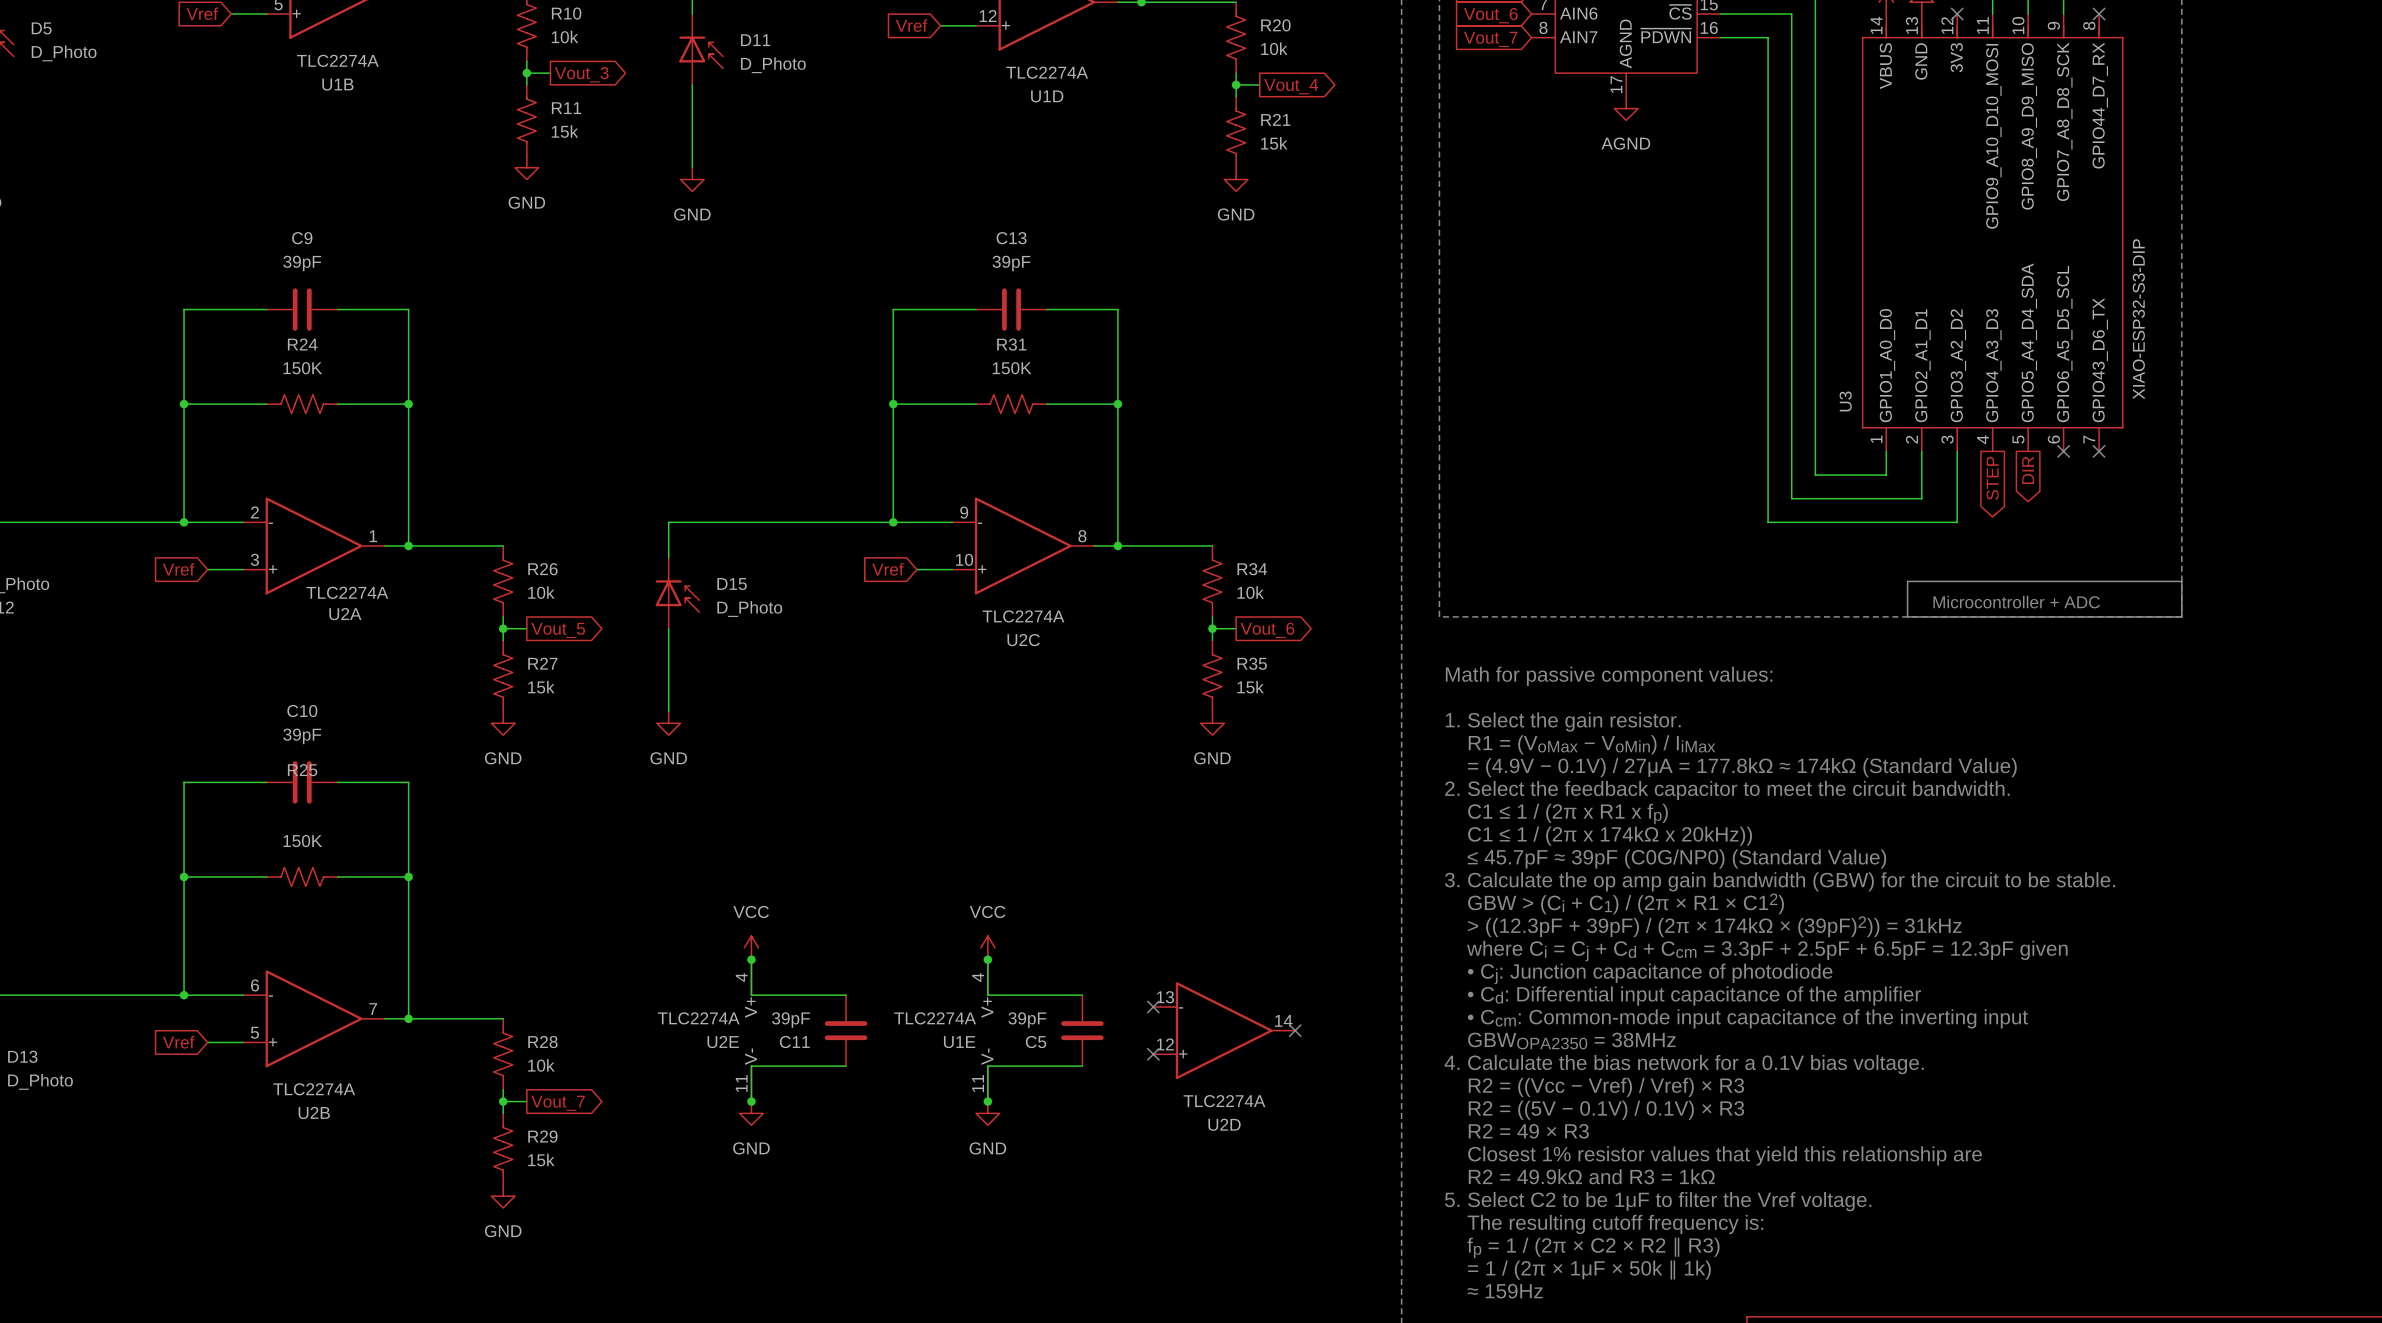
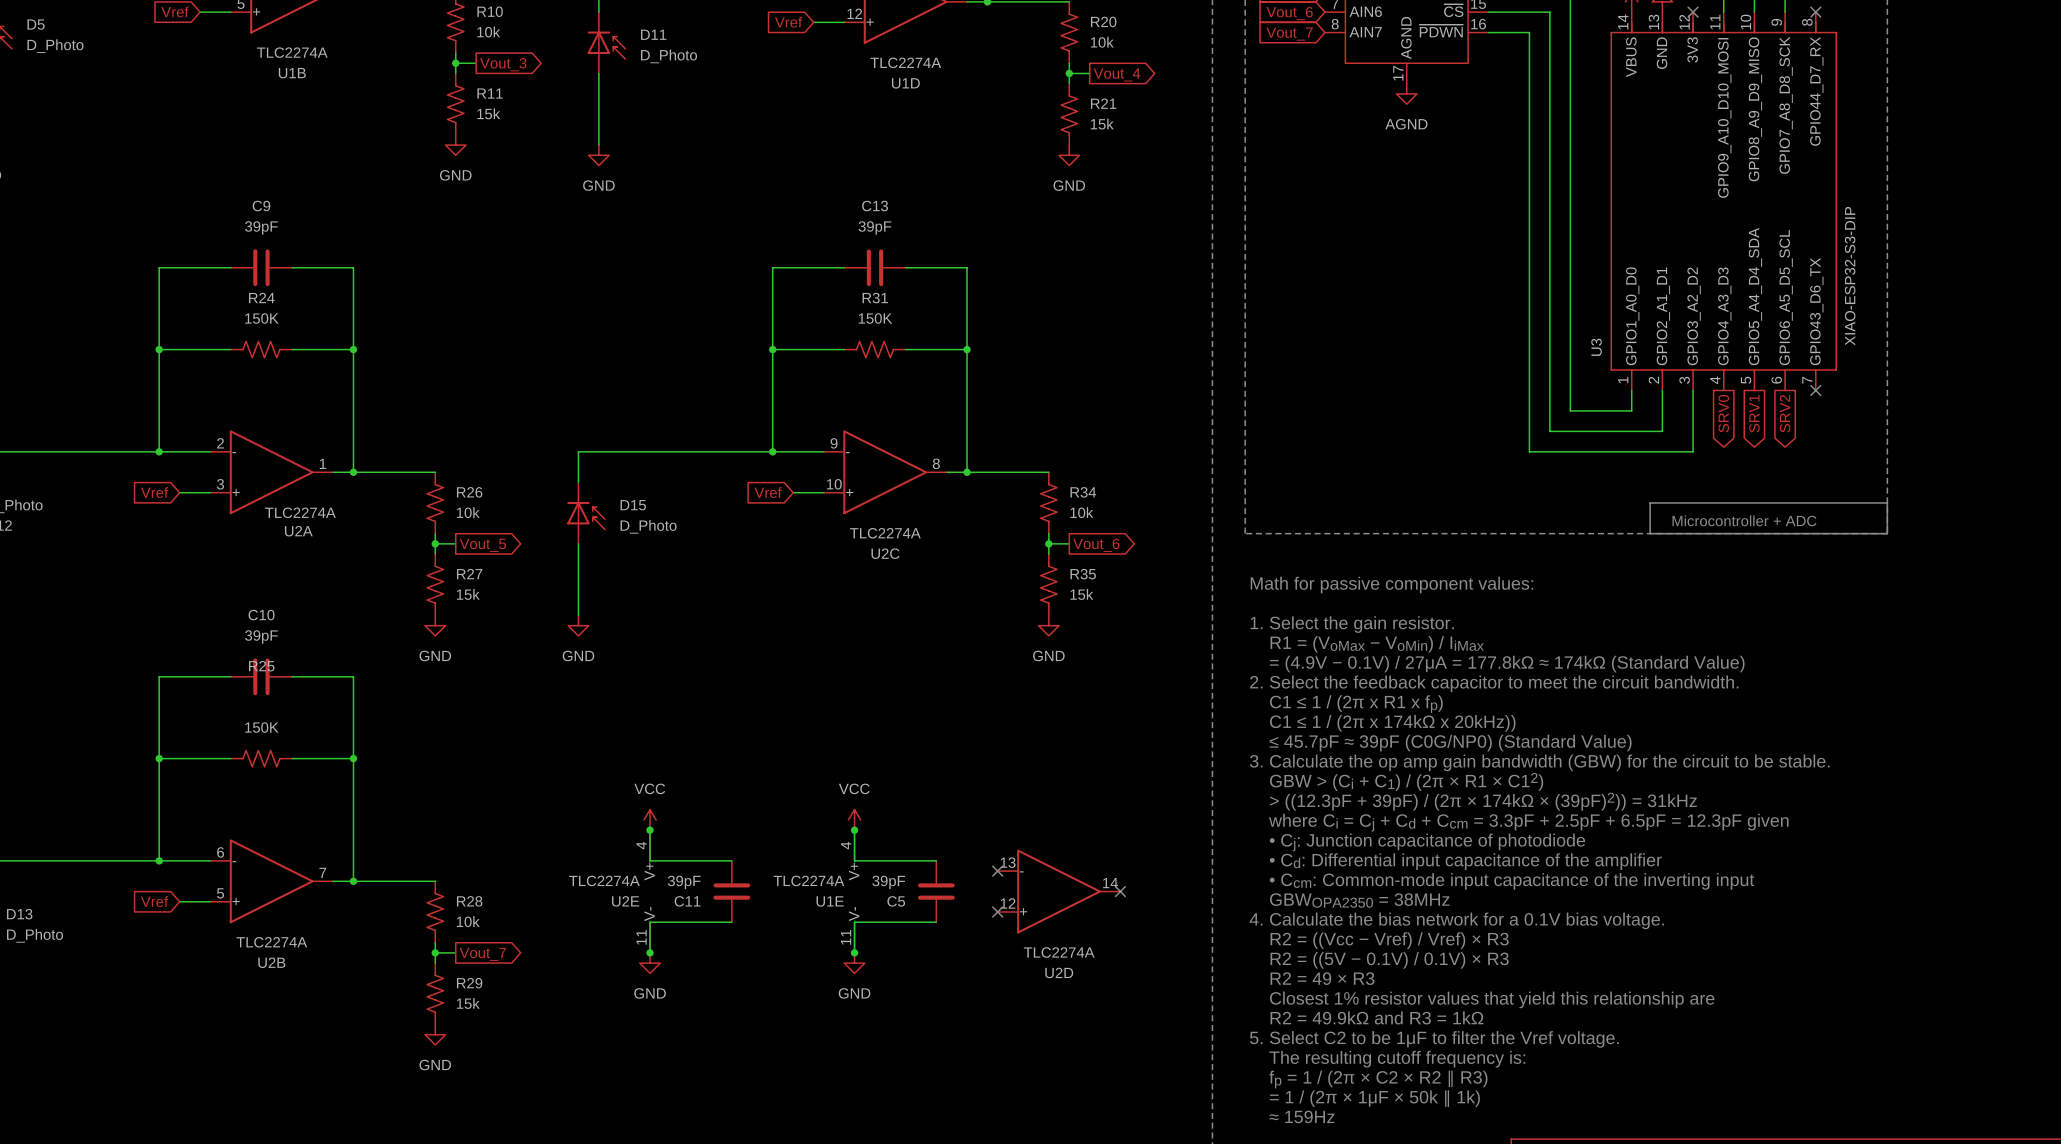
no-connect mark: (2063, 451) -> none
global label: DIR (2028, 470) -> SRV1 (1754, 413)
global label: STEP (1992, 478) -> SRV0 (1723, 413)
global label: none -> SRV2 (1785, 413)

